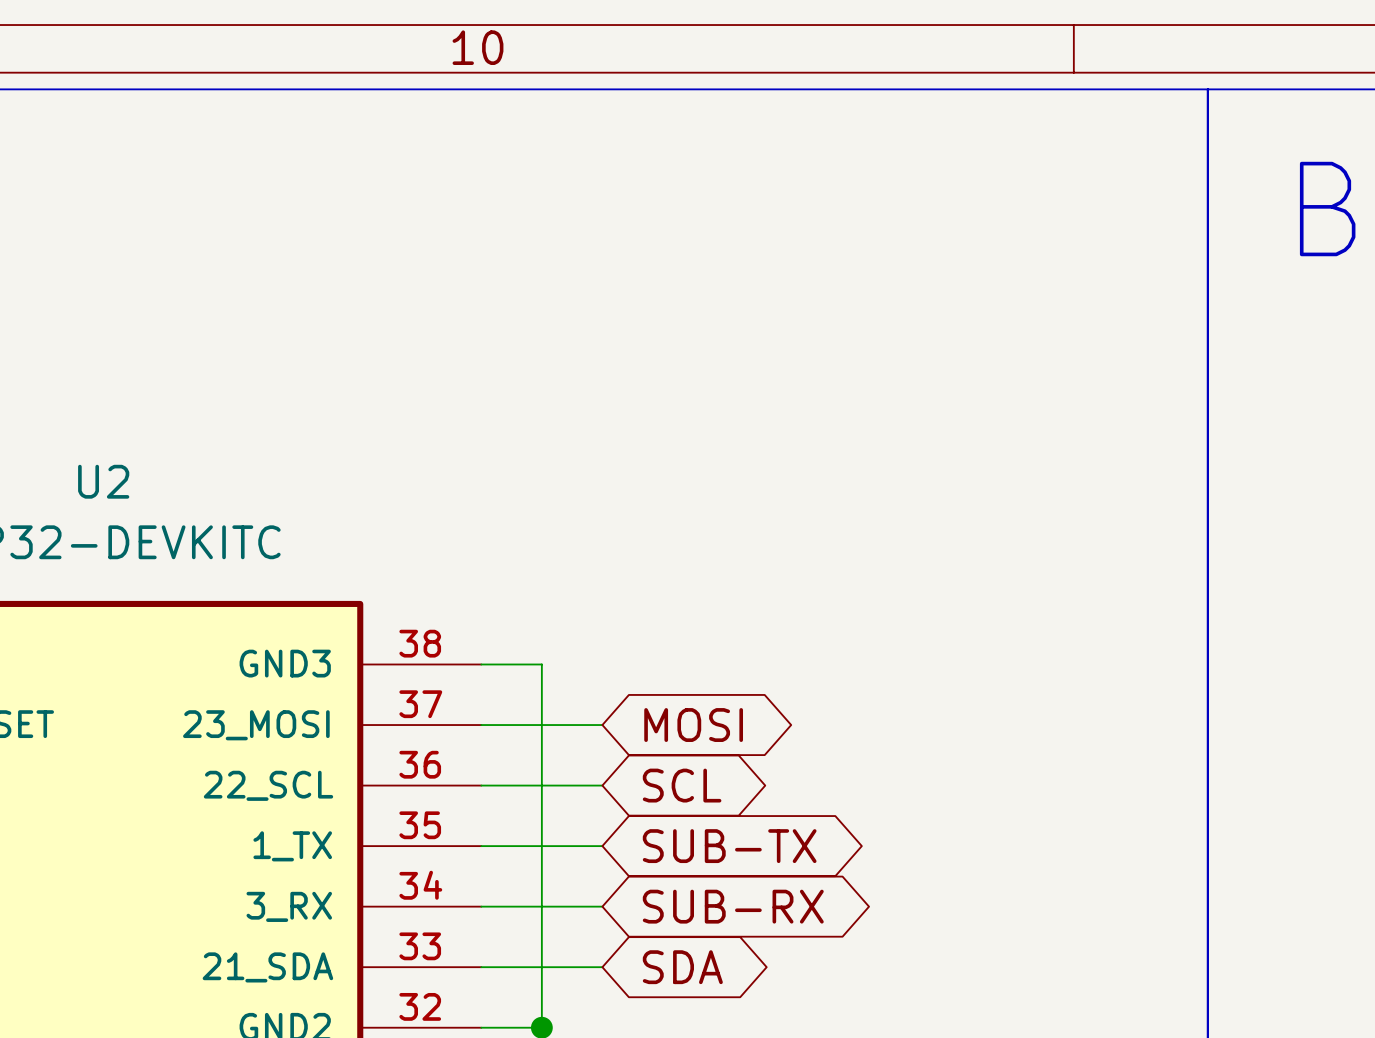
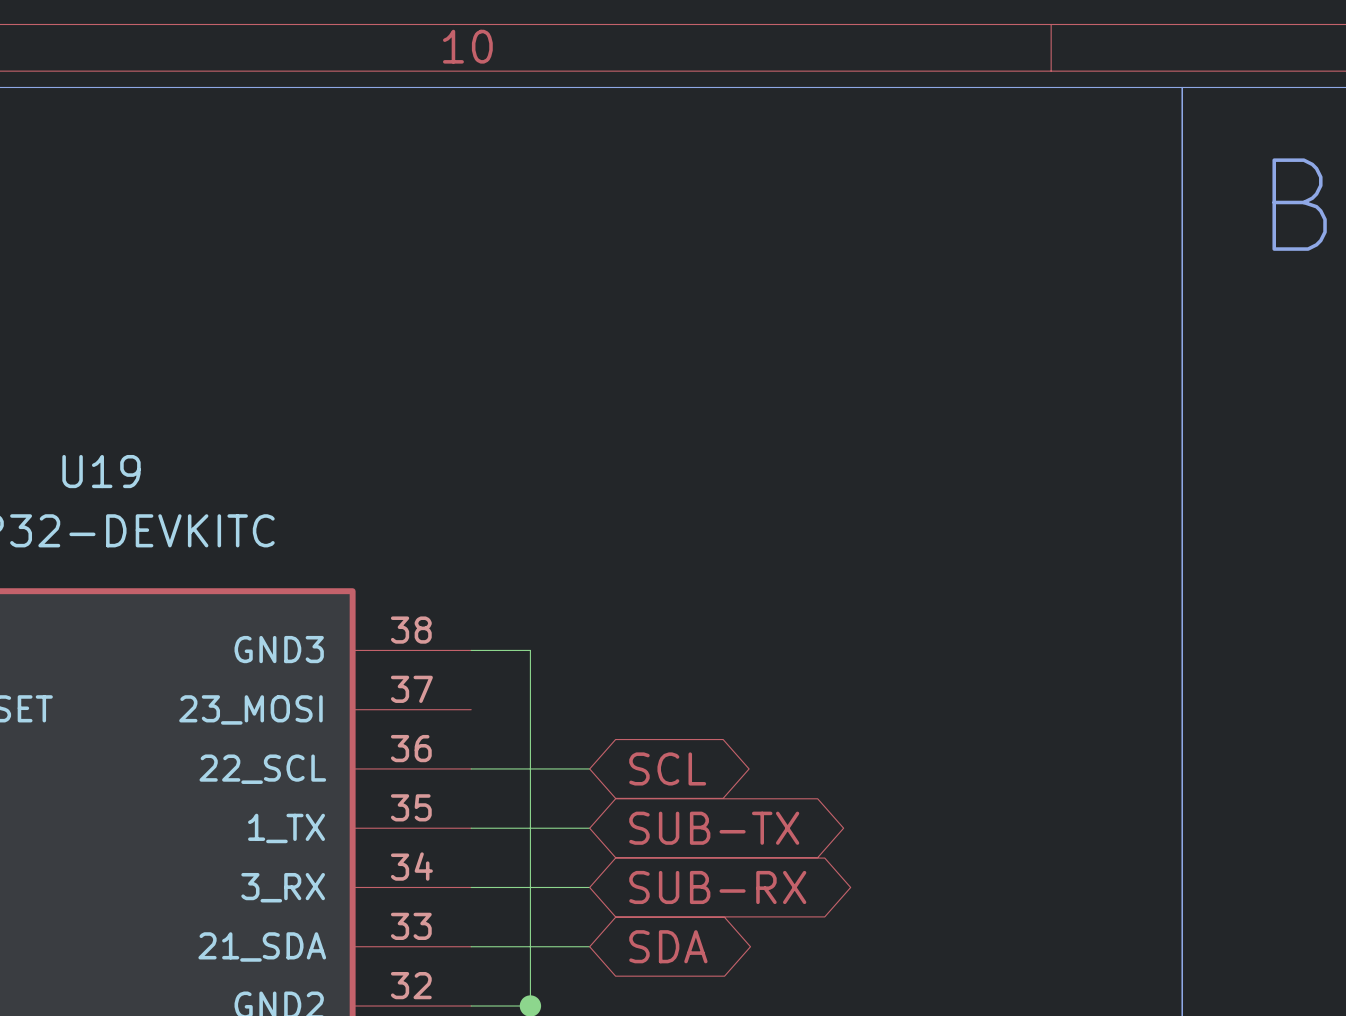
U2 name: U2 (103, 481) -> U19 (101, 471)
wire: (481, 725) (602, 725) -> none
global label: MOSI (693, 725) -> none

